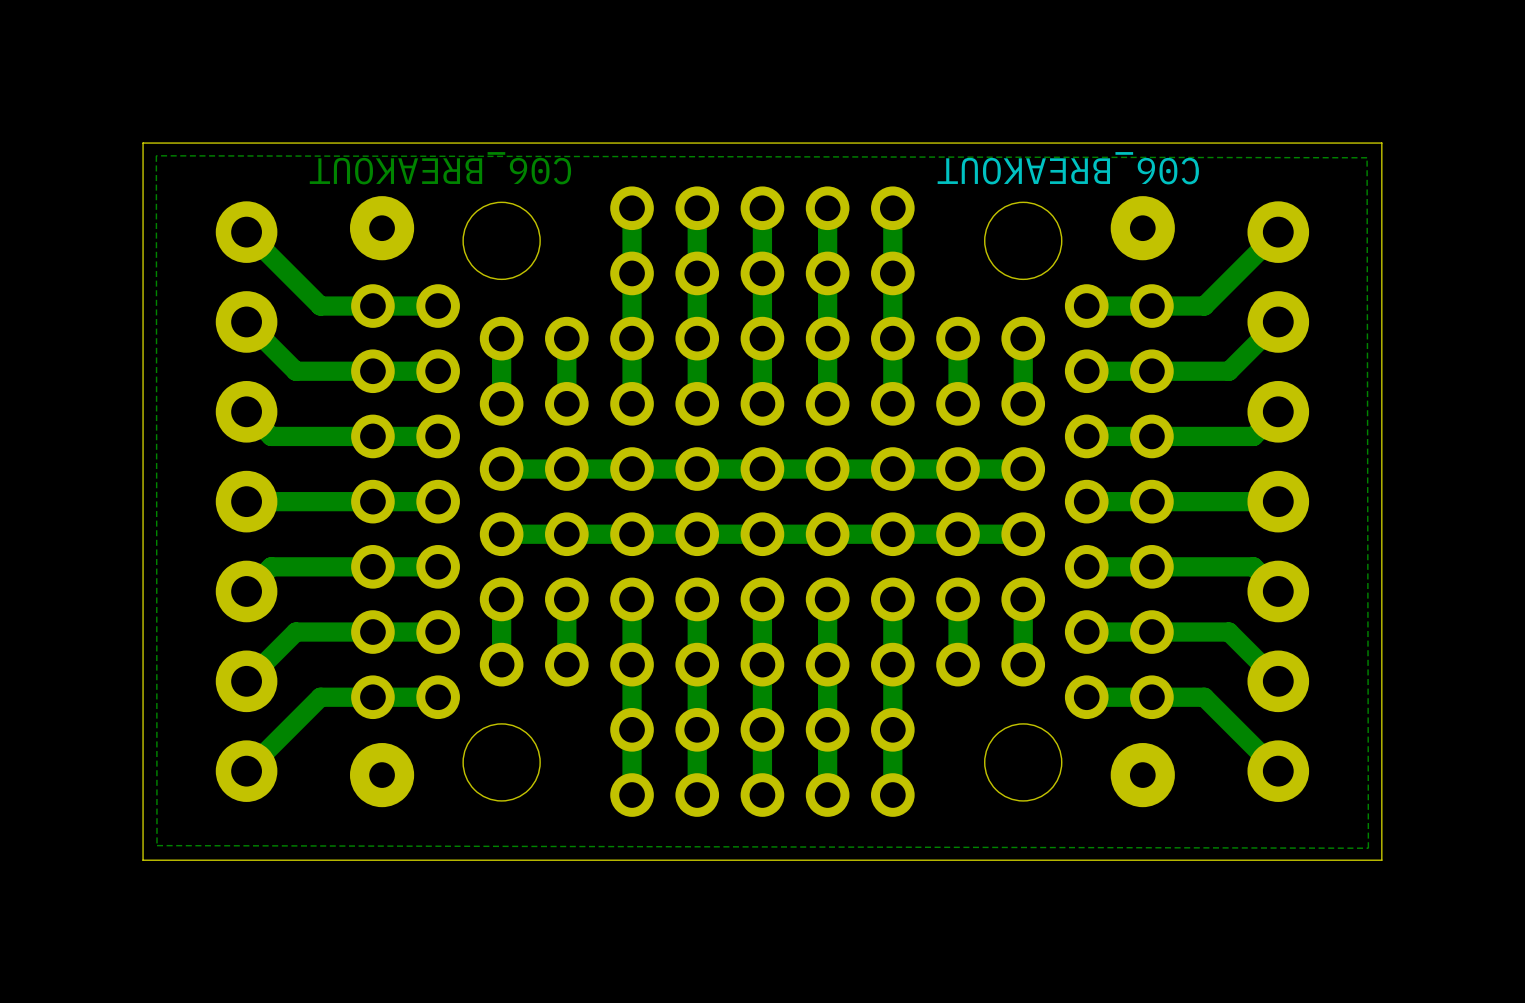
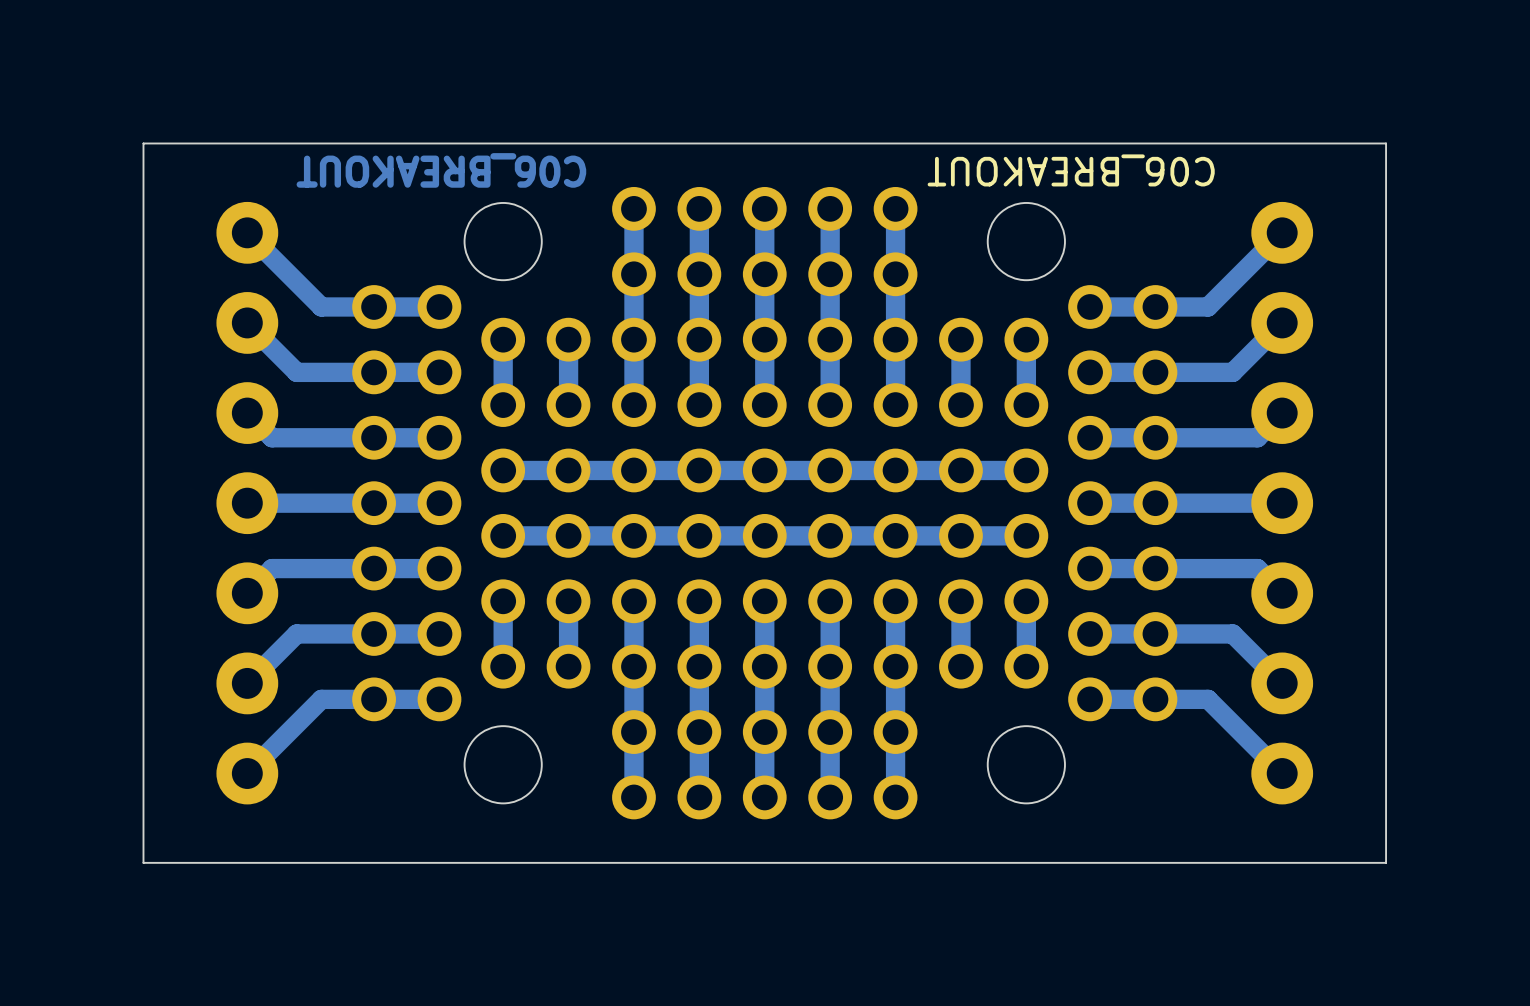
zone outline: (156, 155) (157, 845) (1368, 848) (1367, 157) (156, 155) -> none
part: (382, 228) -> none
part: (1142, 228) -> none
part: (382, 775) -> none
part: (1142, 775) -> none

